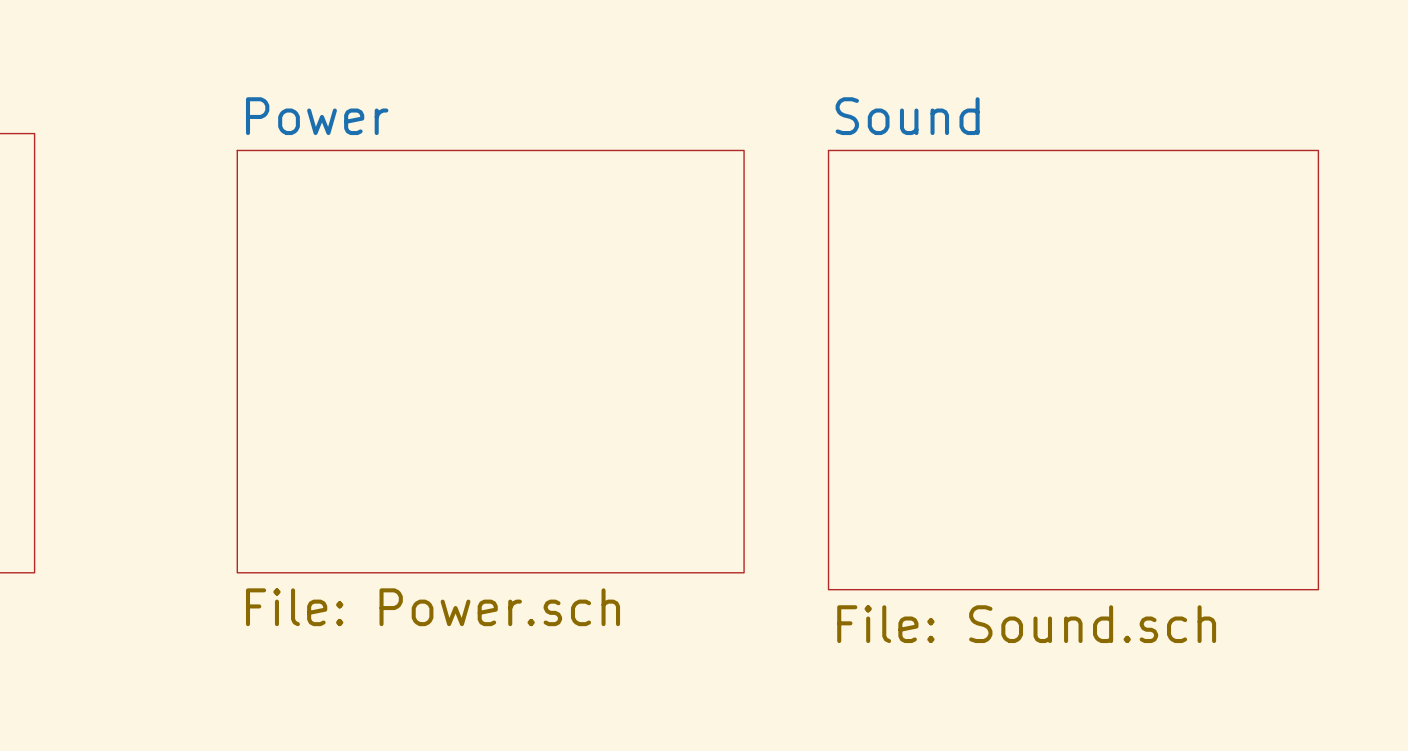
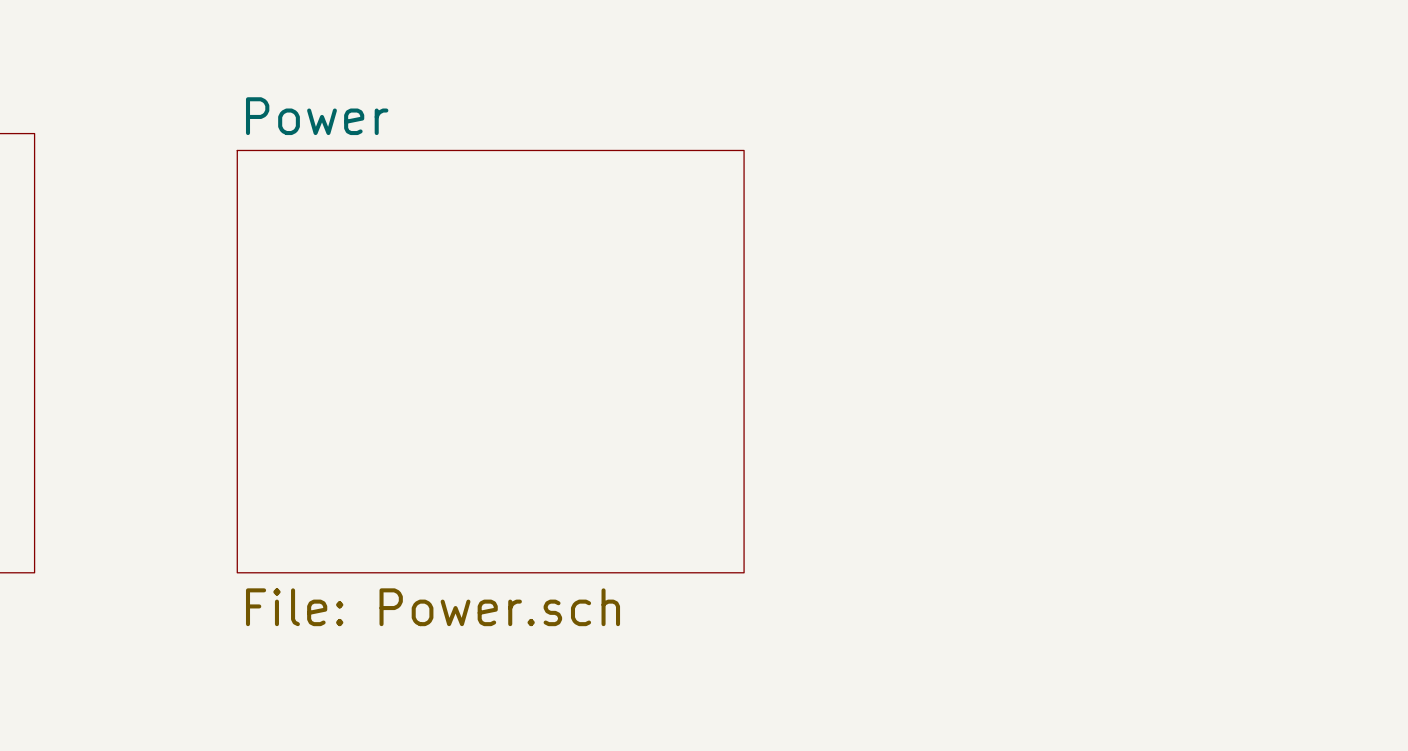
sheet Sound: File: Sound.sch (1073, 370) -> none

